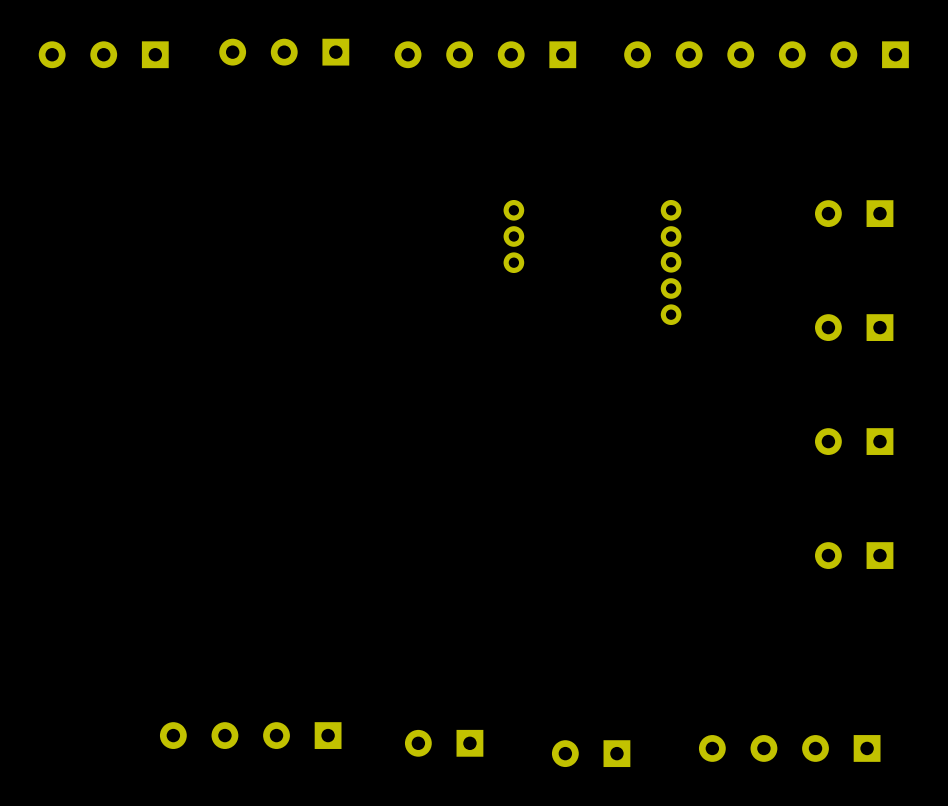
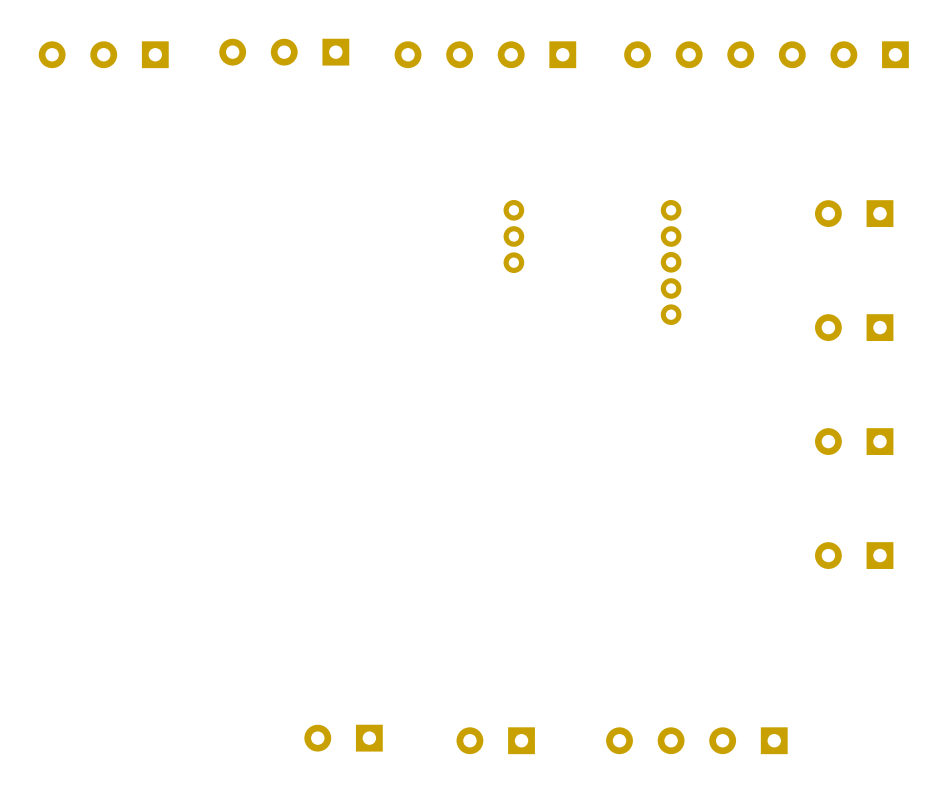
part: (250, 735) -> none
part: none -> (343, 738)
part: none -> (495, 740)
part: (444, 743) -> none
part position: (789, 748) -> (696, 740)
part: (591, 753) -> none

